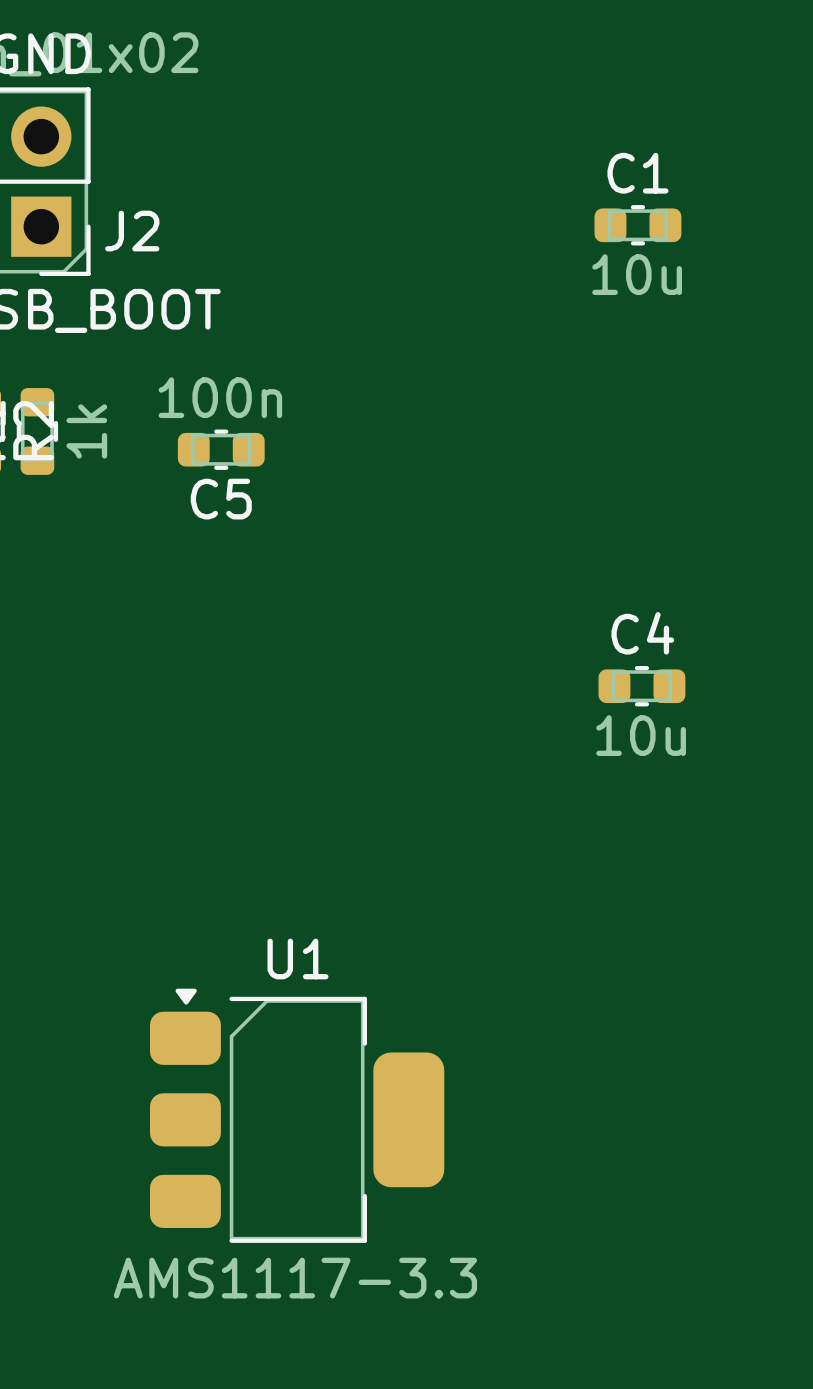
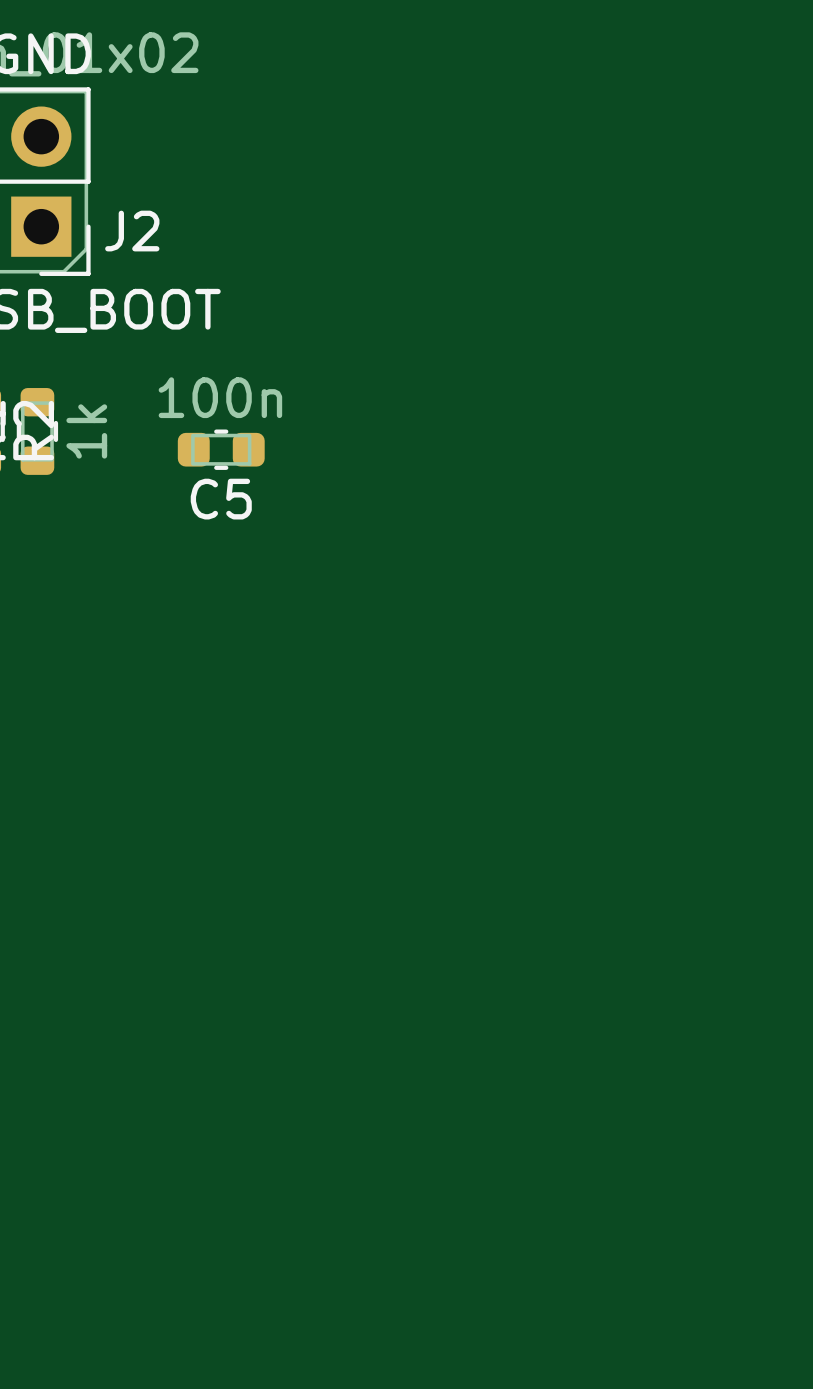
C1: 10u (637, 225) -> none
C4: 10u (641, 686) -> none
U1: AMS1117-3.3 (297, 1115) -> none

